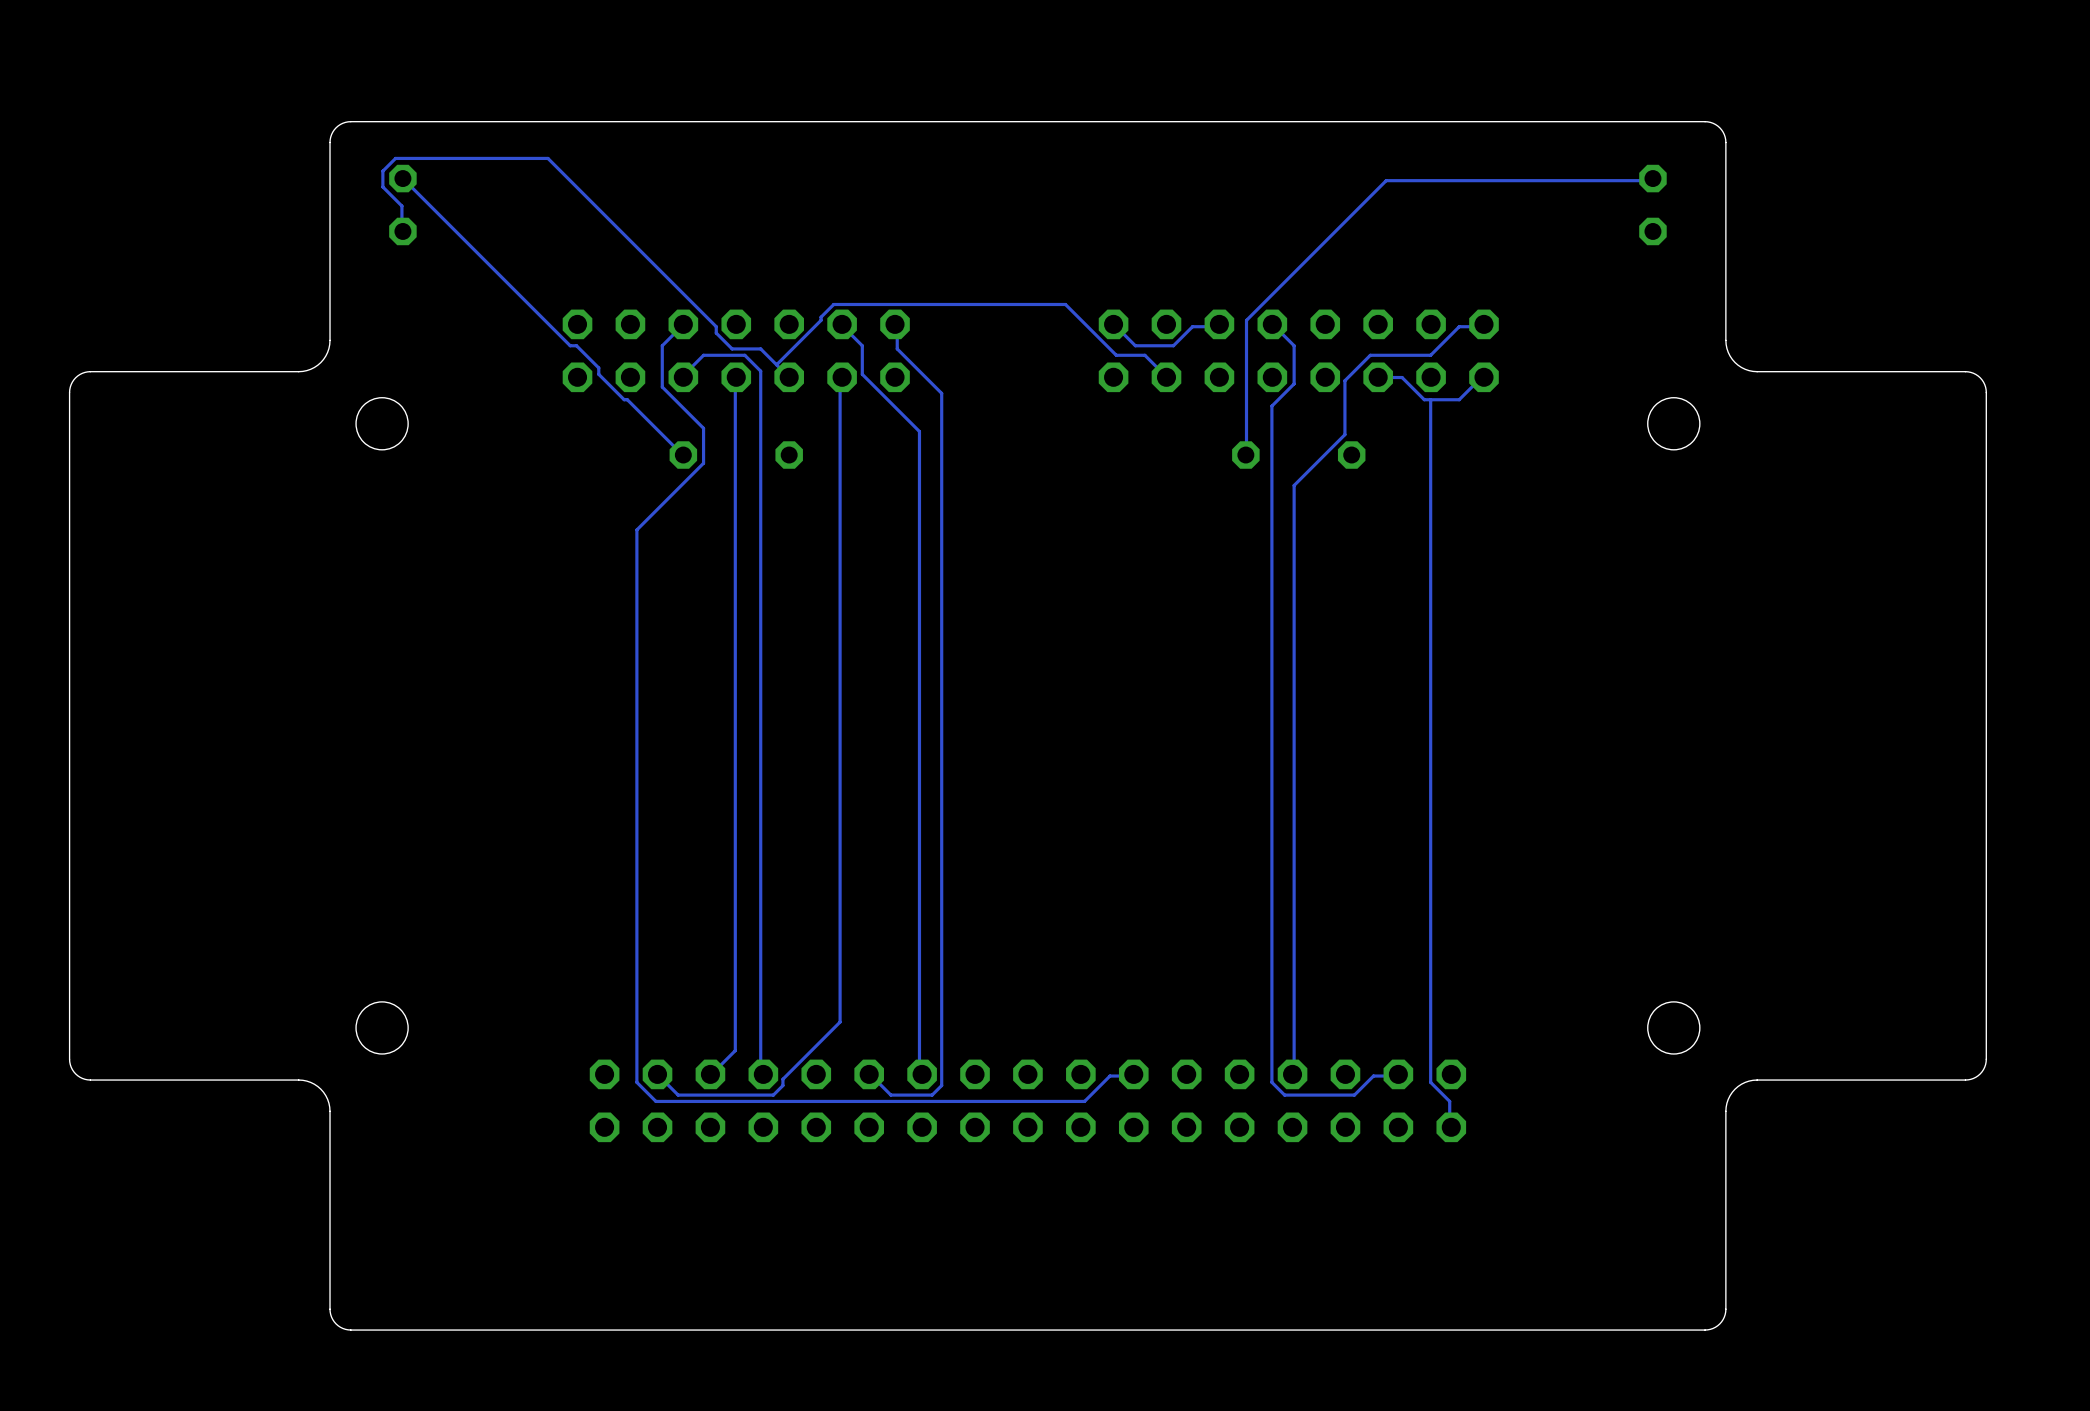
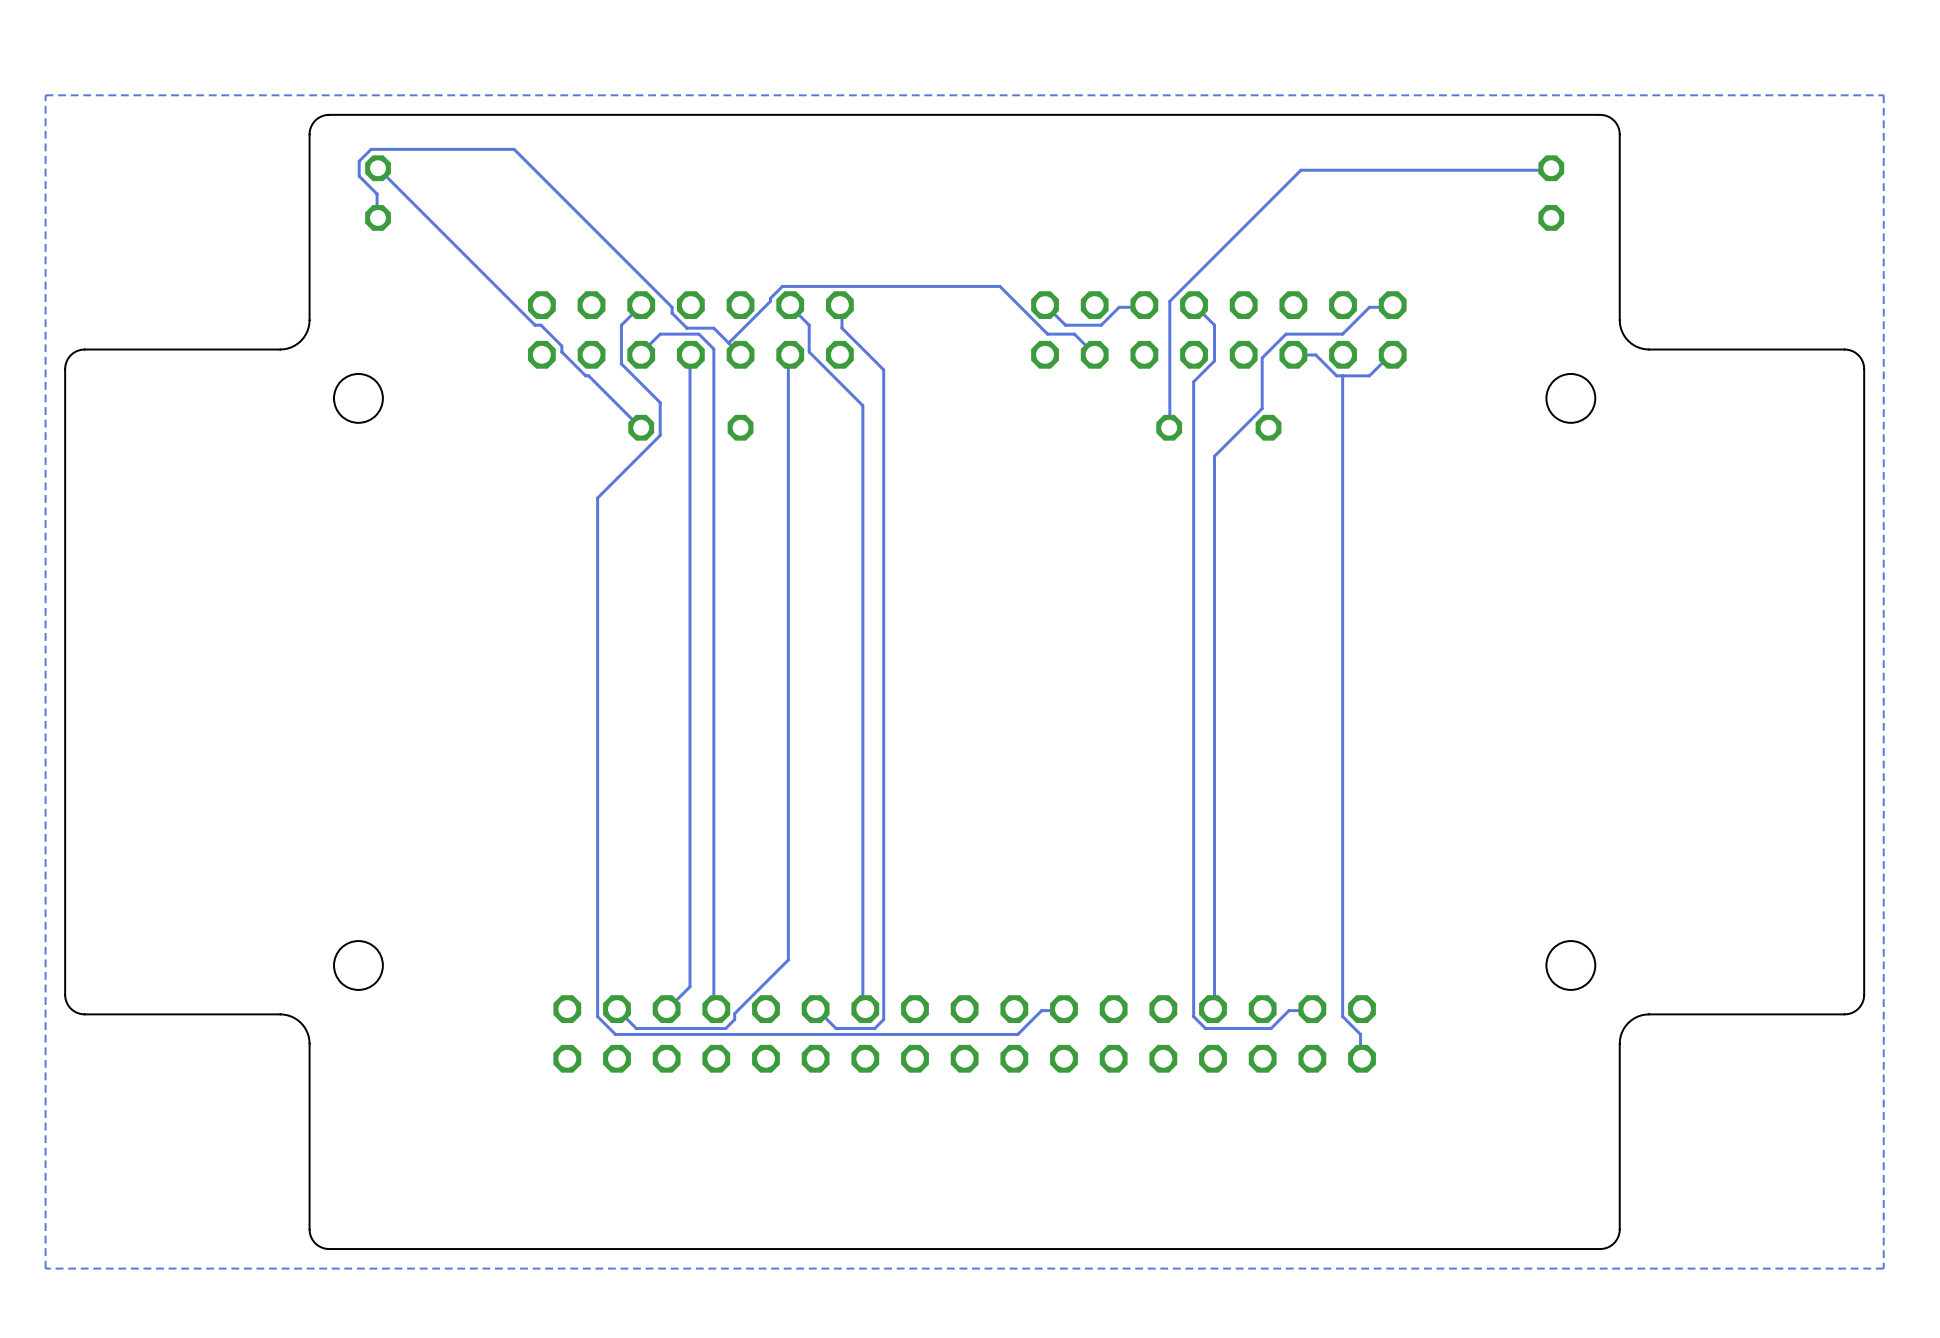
zone outline: none -> (1883, 95) (45, 95) (45, 1268) (1883, 1268) (1883, 95)

